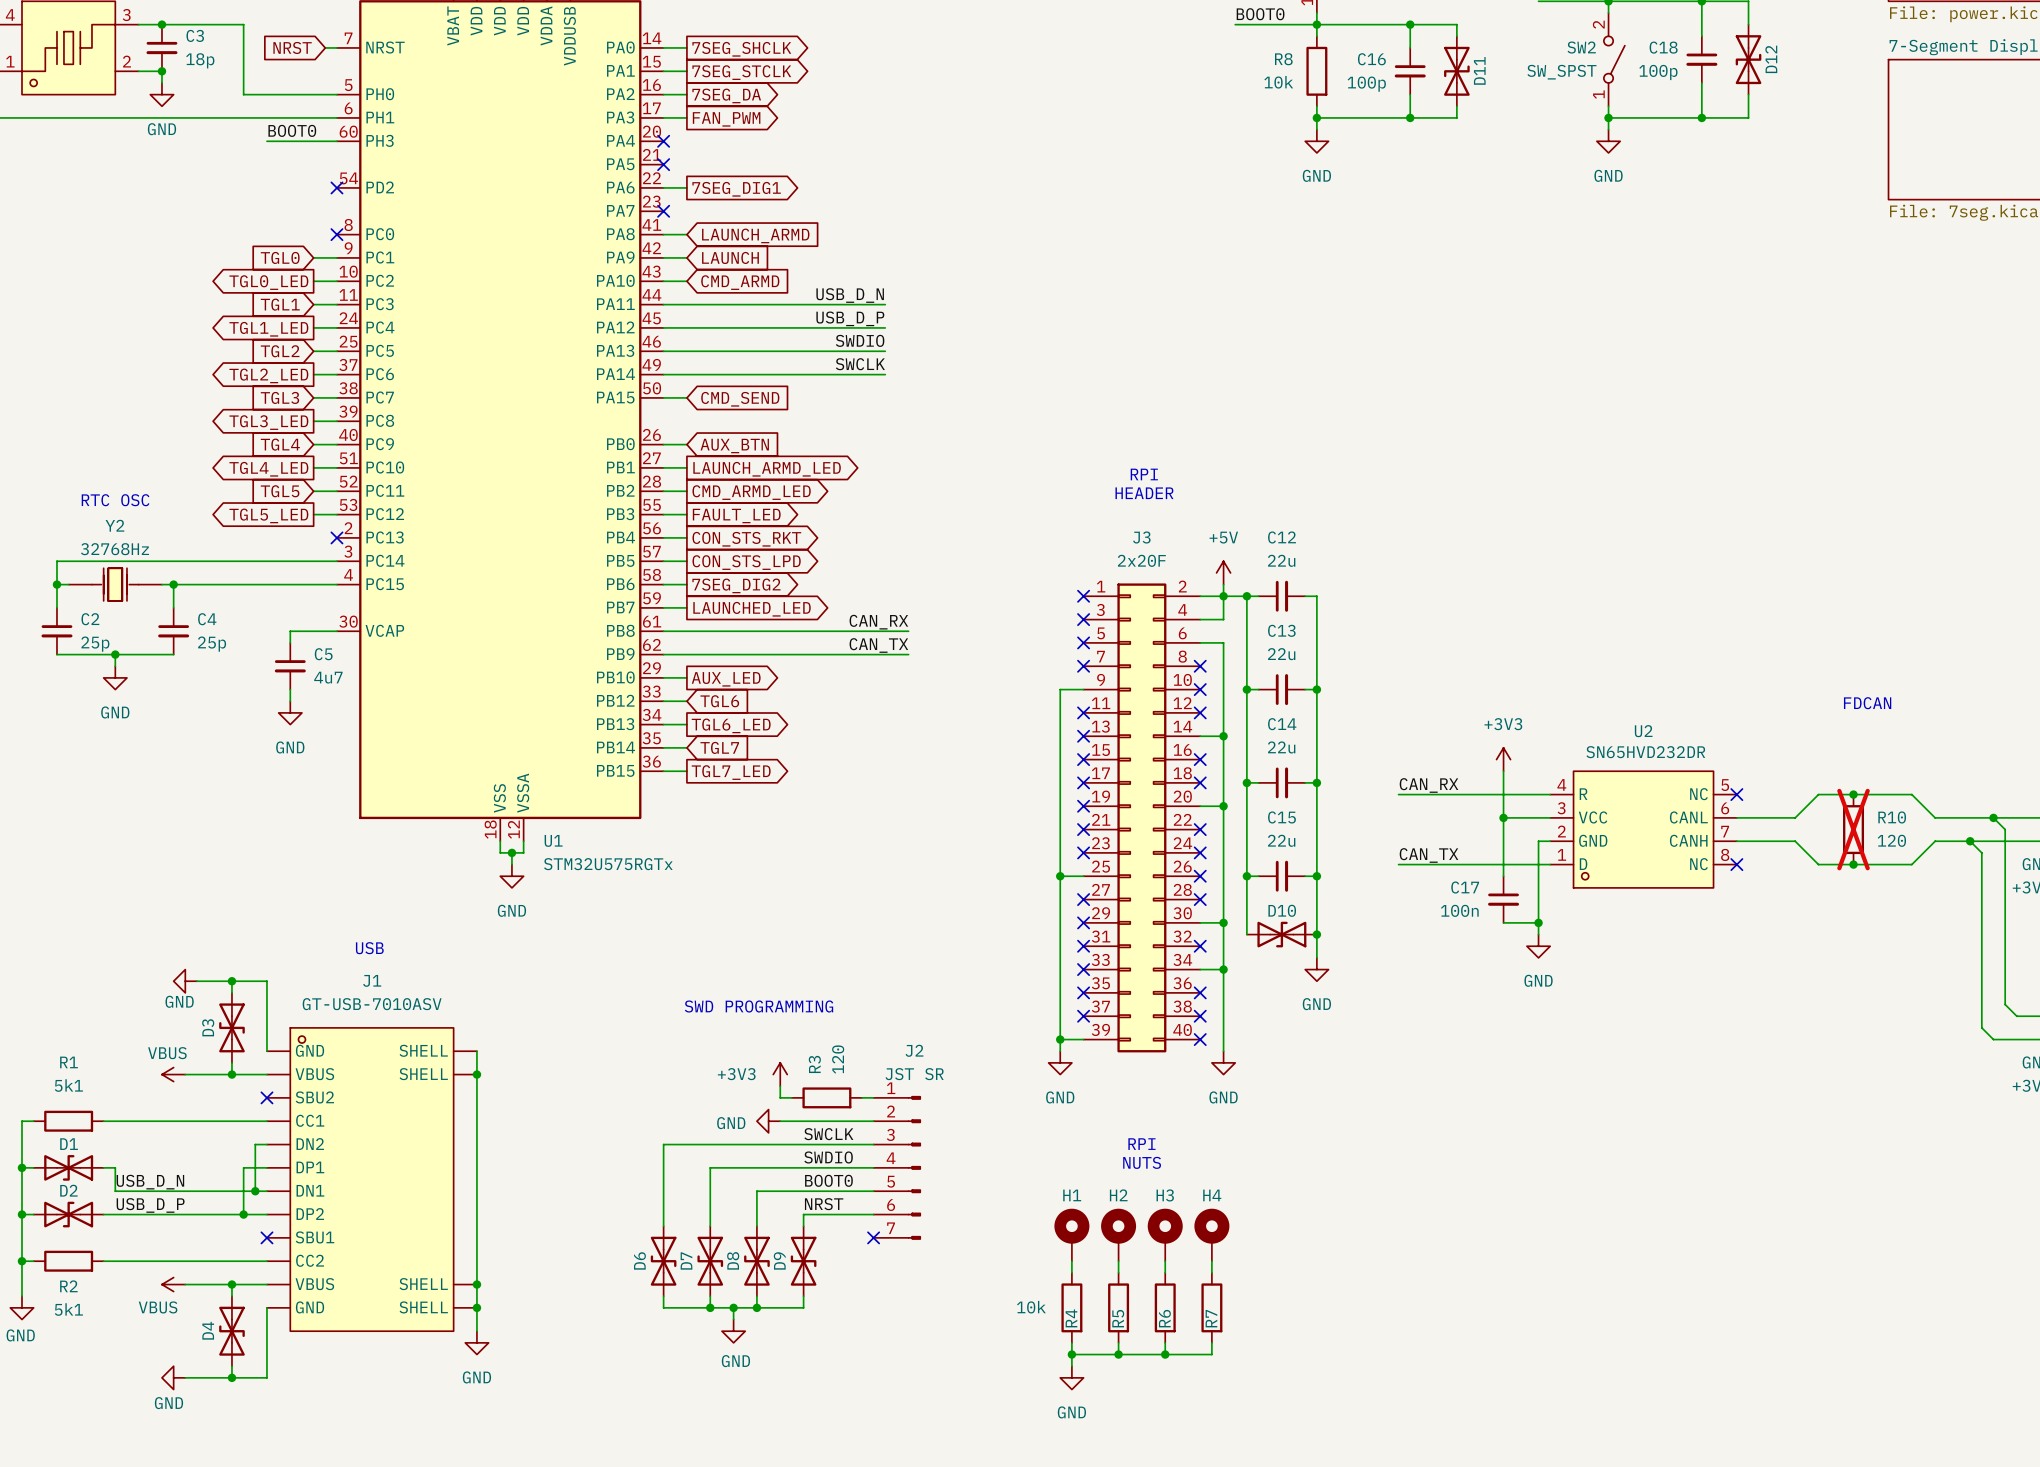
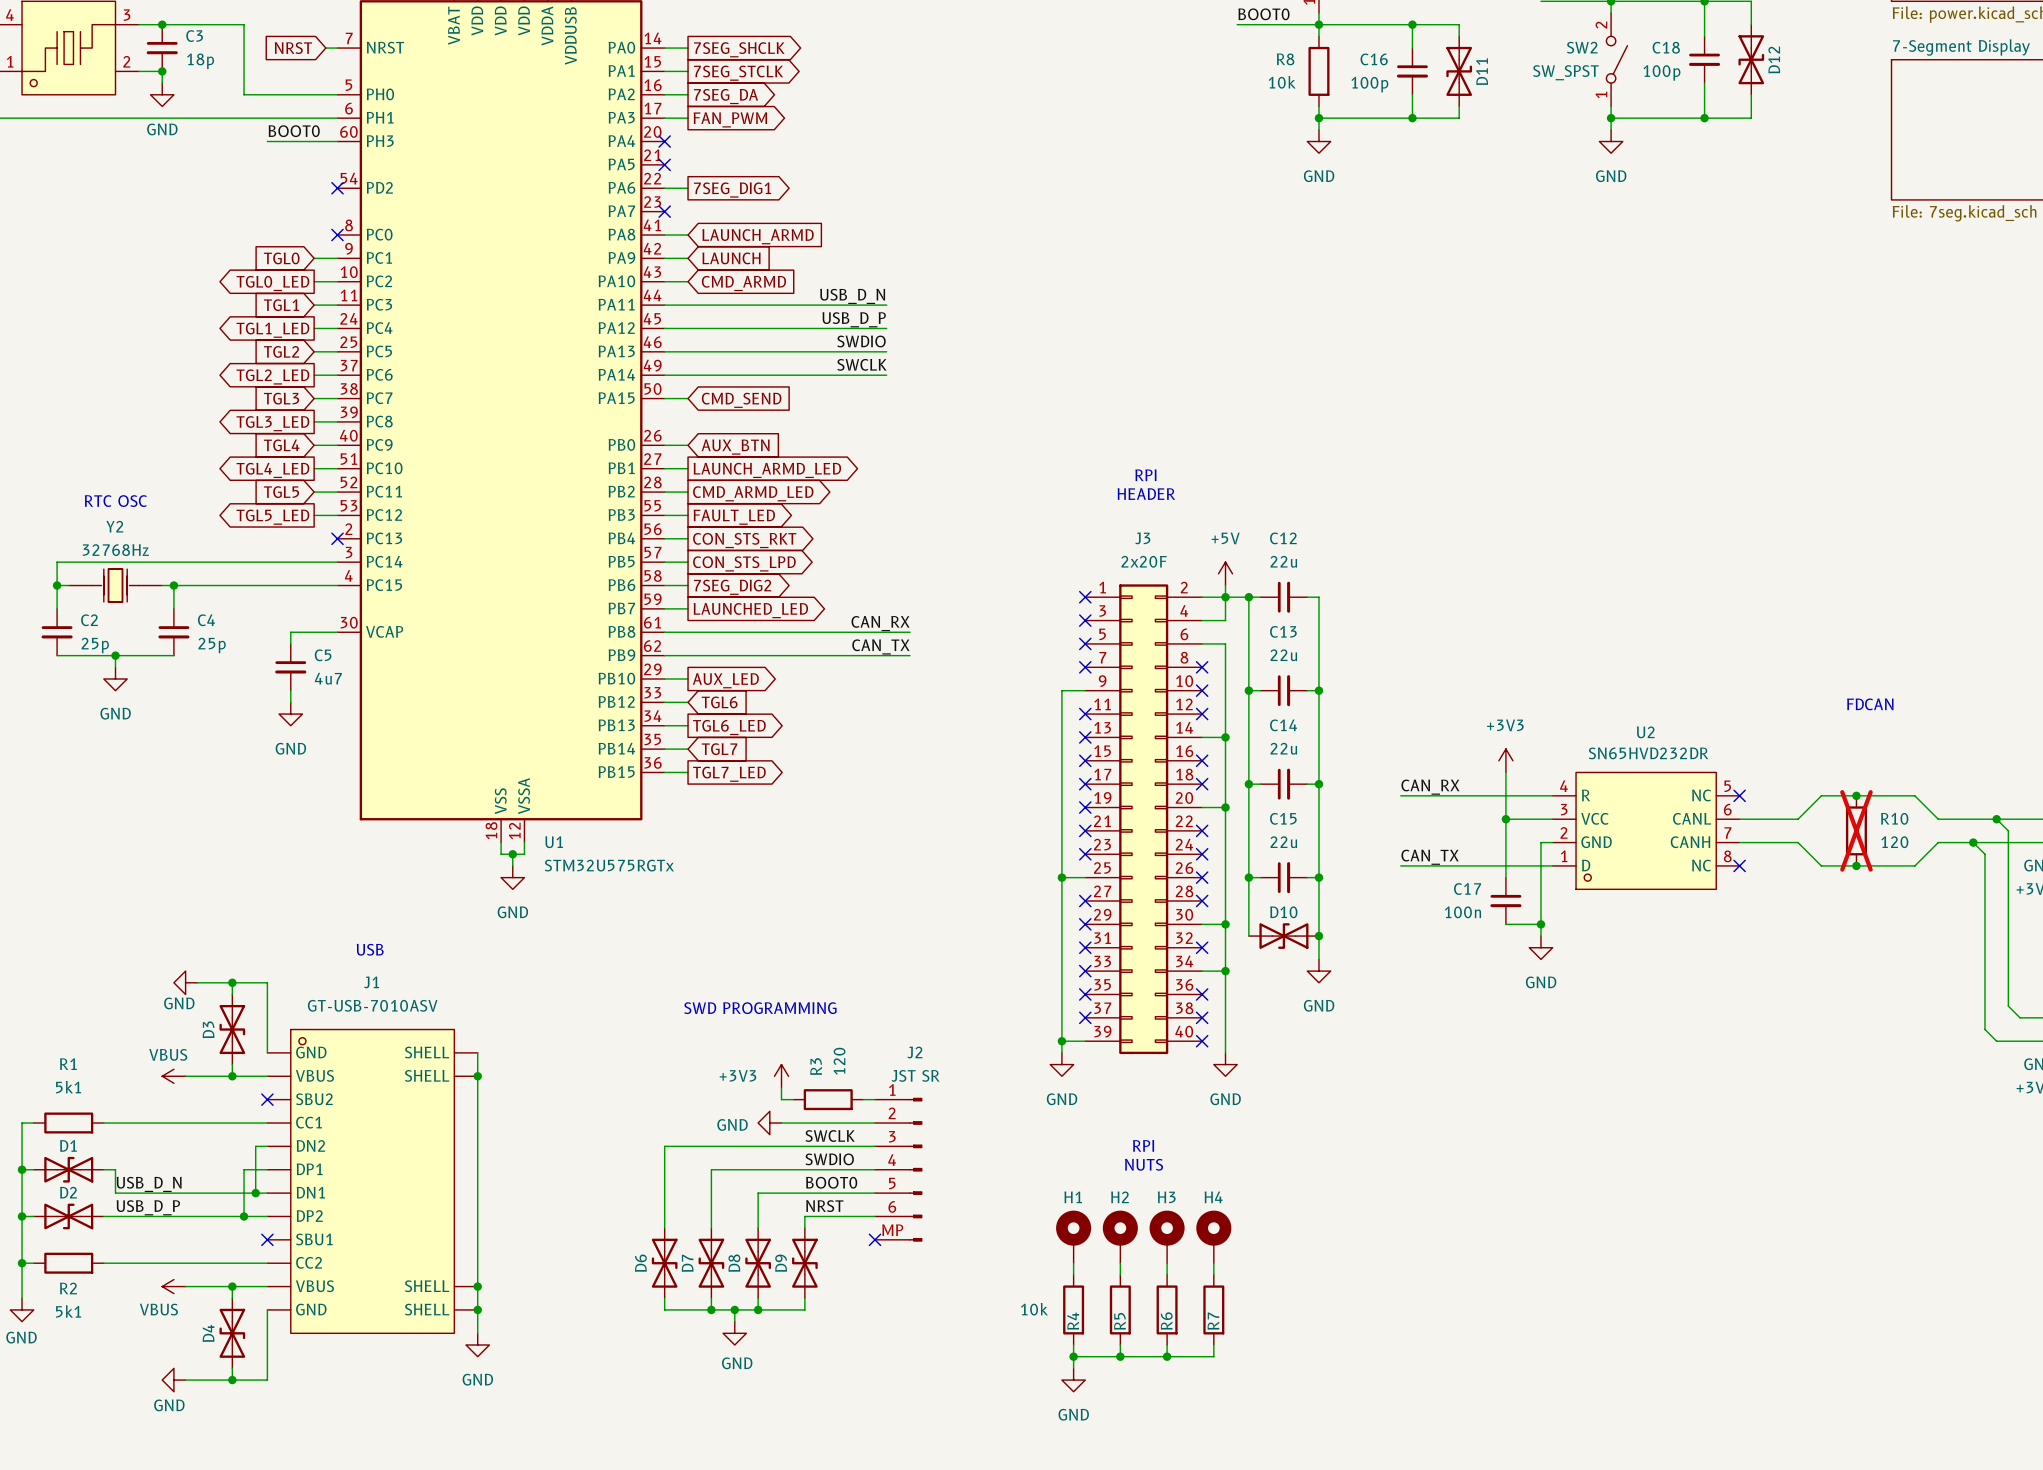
J2 pin number: 7 (891, 1228) -> MP (892, 1230)

